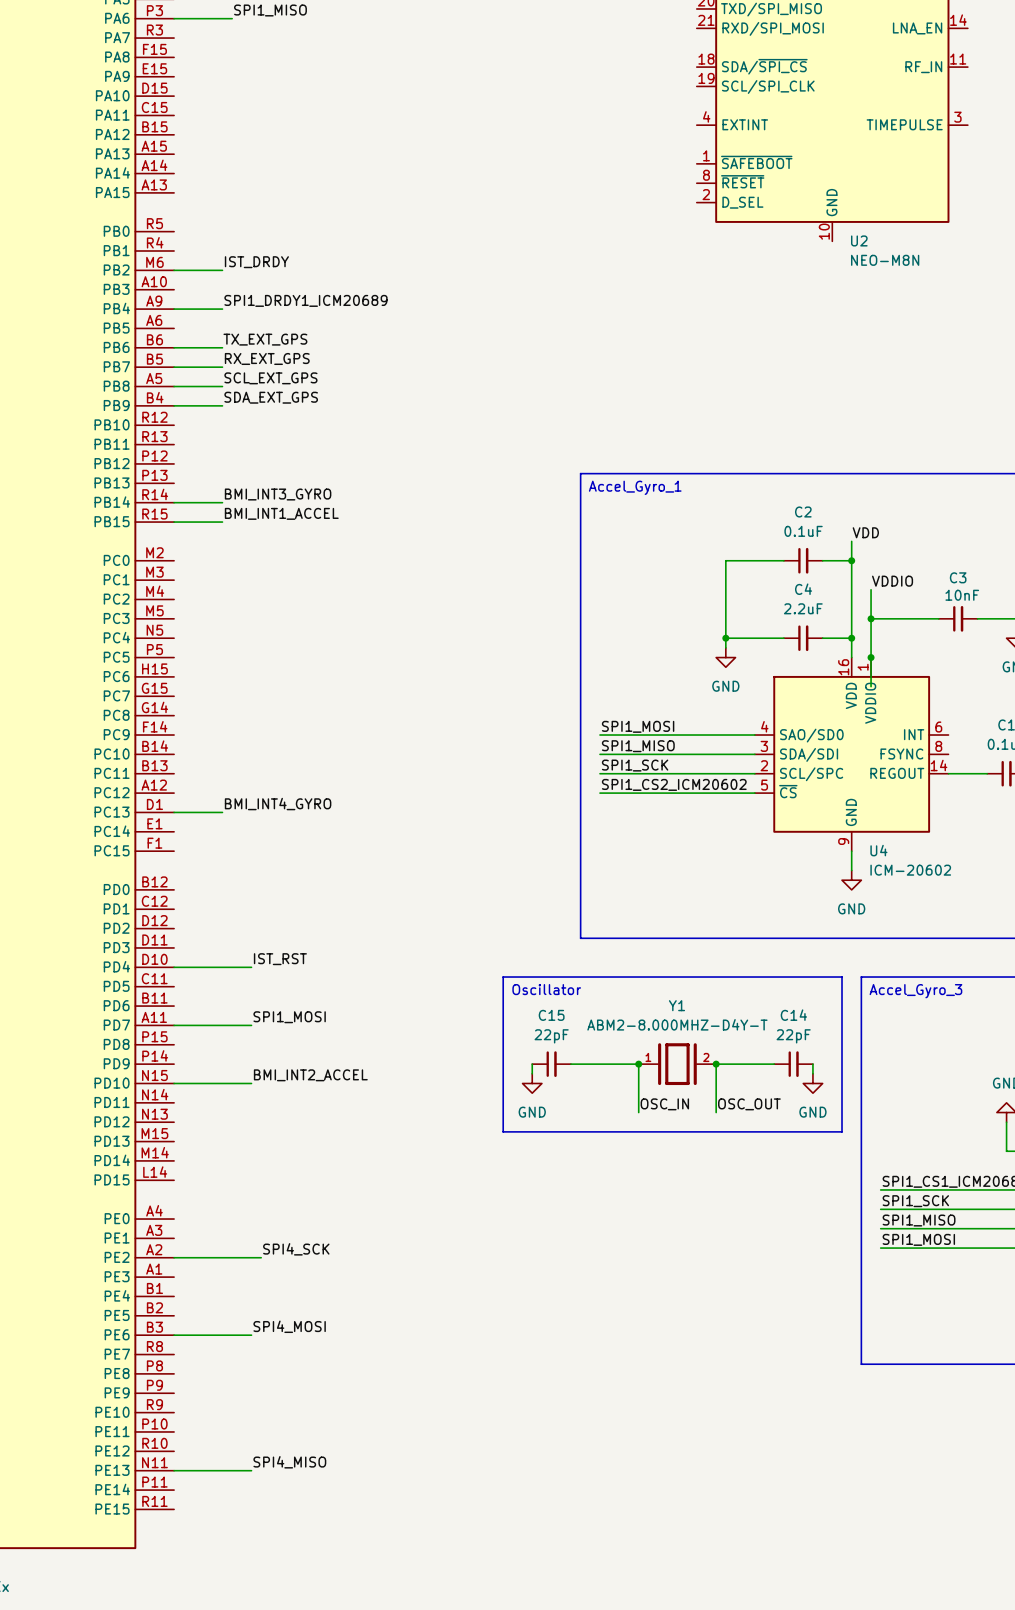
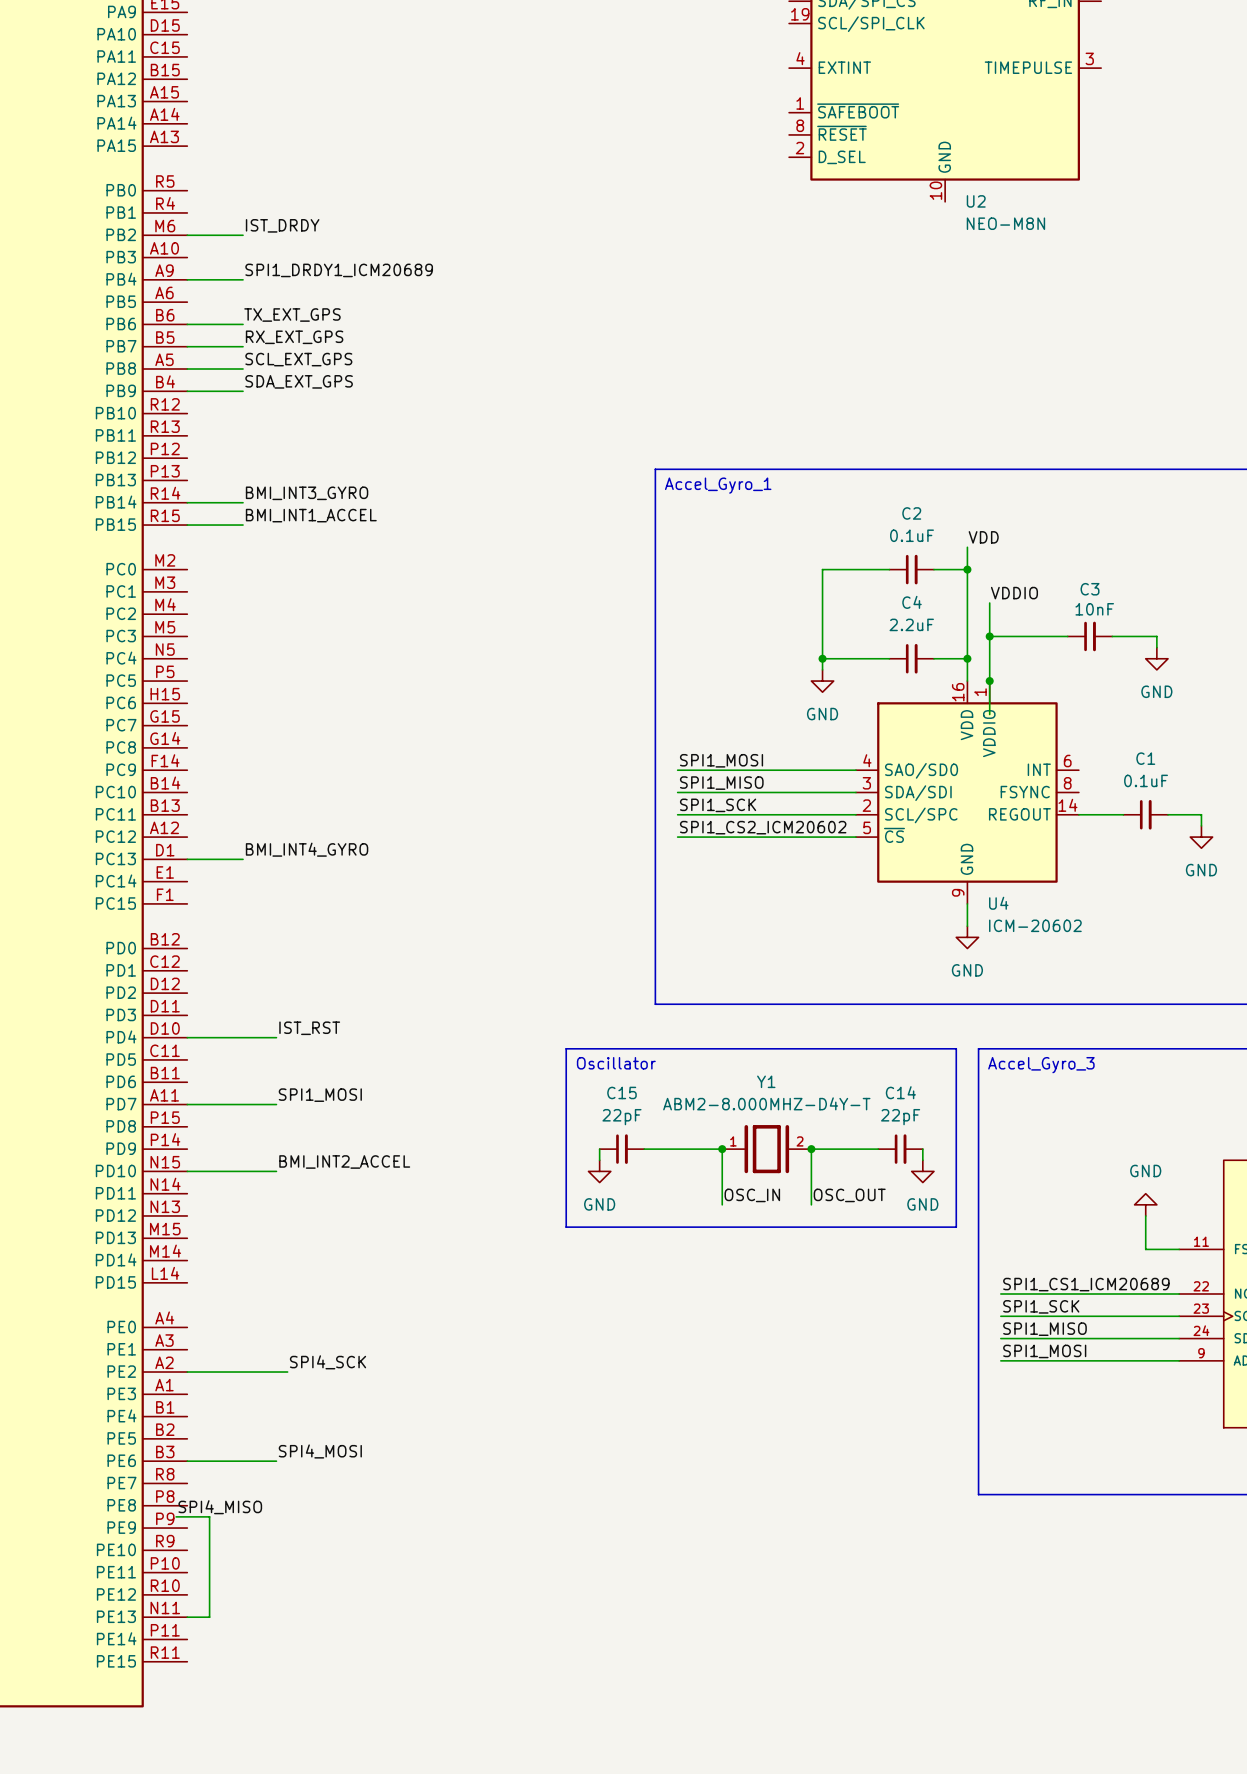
label position: SPI4_MISO (289, 1462) -> SPI4_MISO (220, 1507)
wire: (193, 1470) (251, 1470) -> (209, 1617) (209, 1516) (176, 1516)

